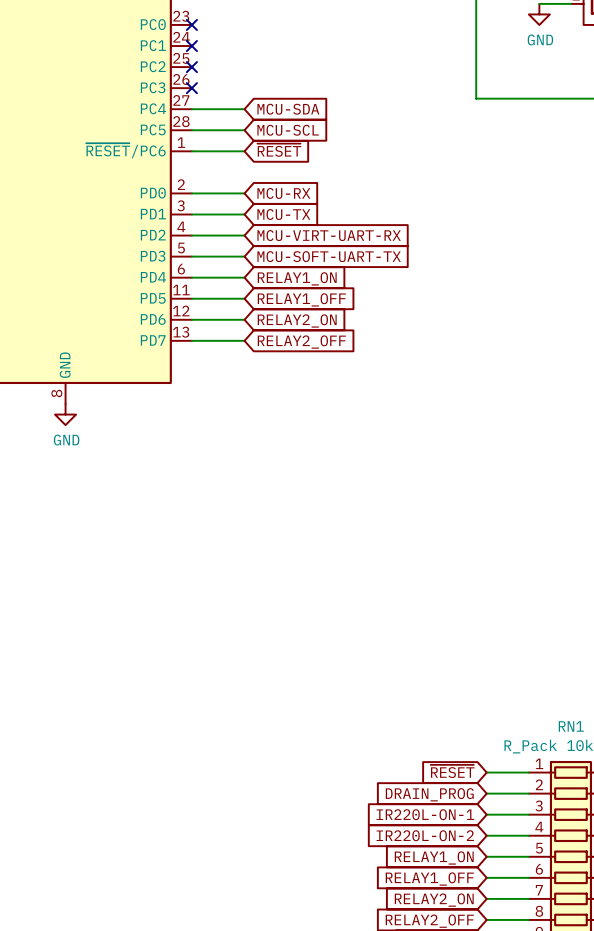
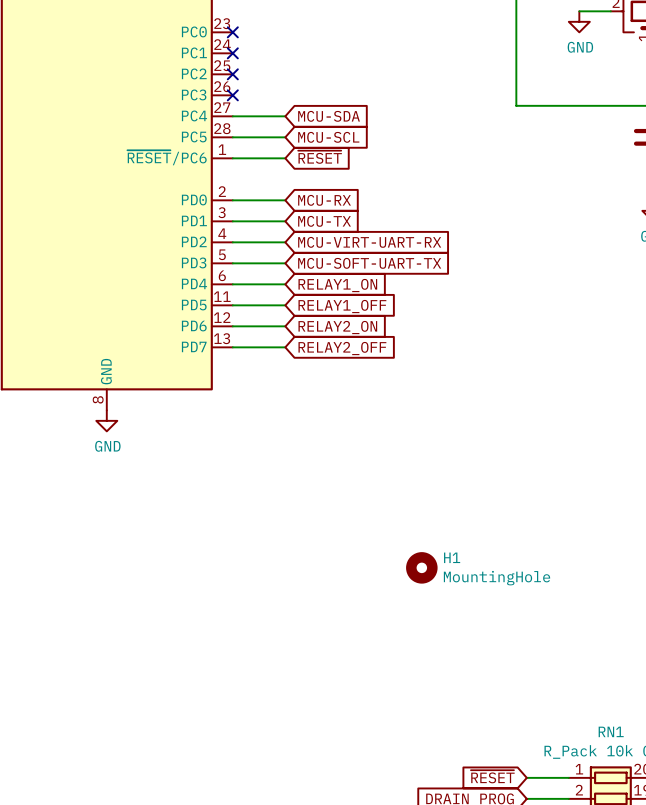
H1: none -> MountingHole (421, 567)

